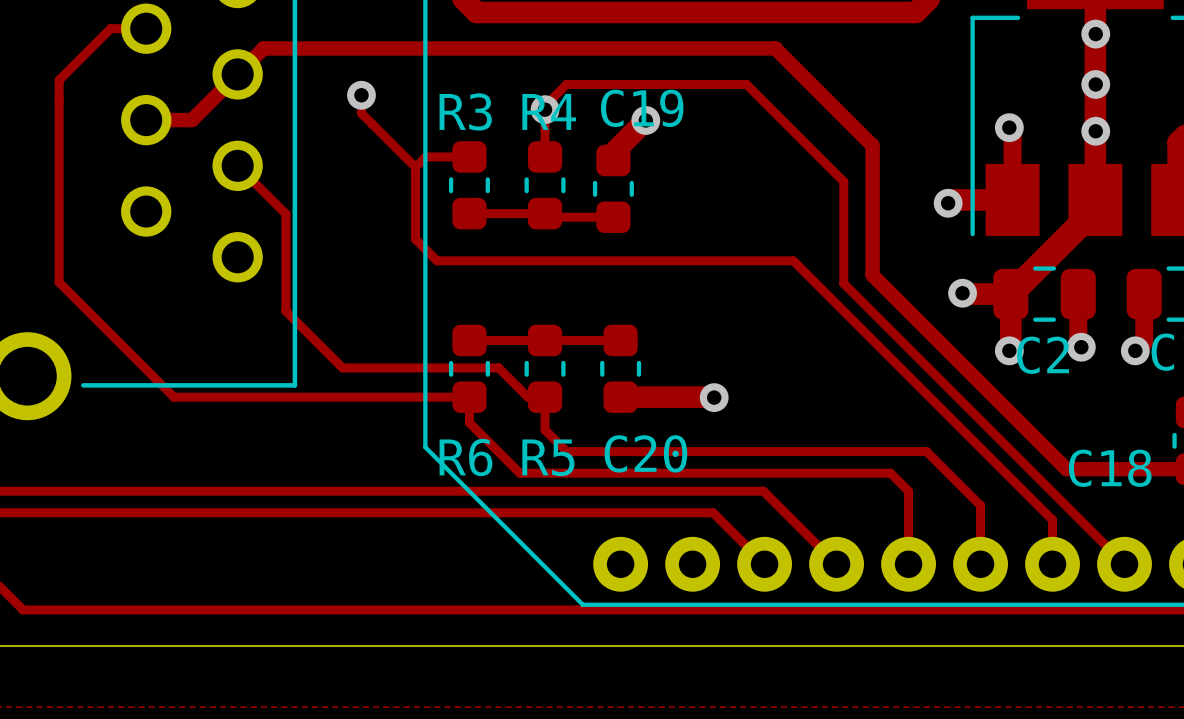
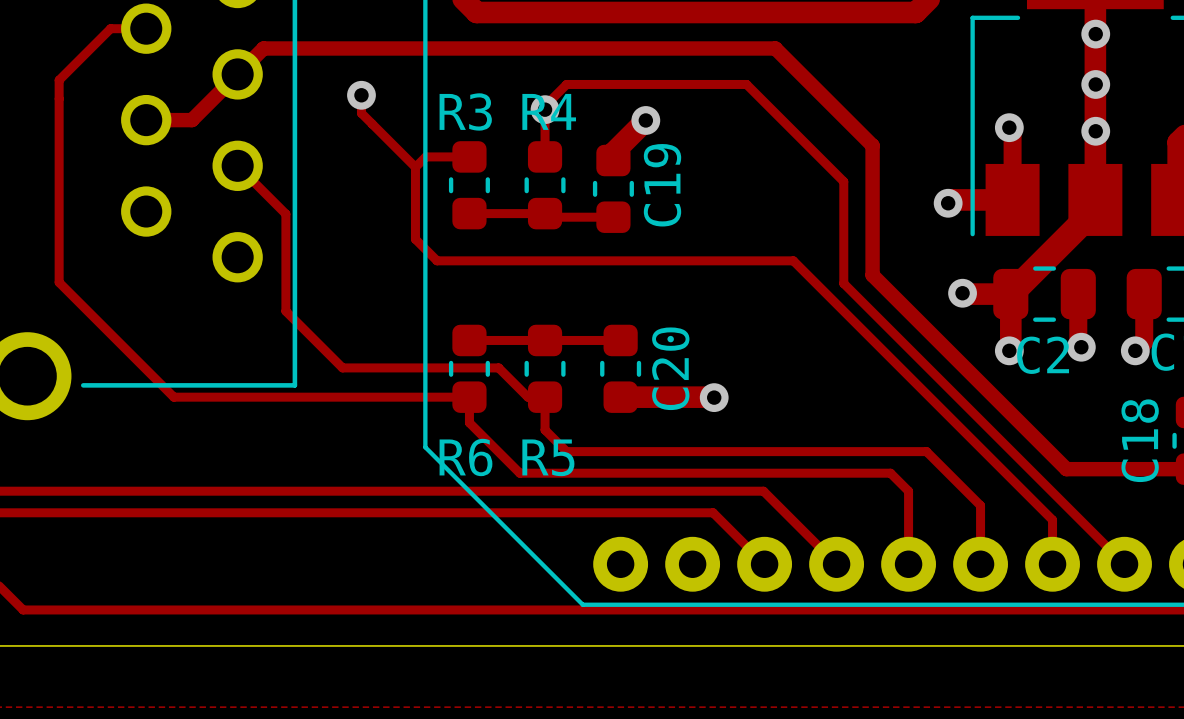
C19 name rotation: 0° (642, 108) -> 90° counterclockwise (662, 185)
C20 name rotation: 0° (645, 453) -> 90° counterclockwise (670, 368)
C18 name rotation: 0° (1110, 468) -> 90° counterclockwise (1140, 440)

